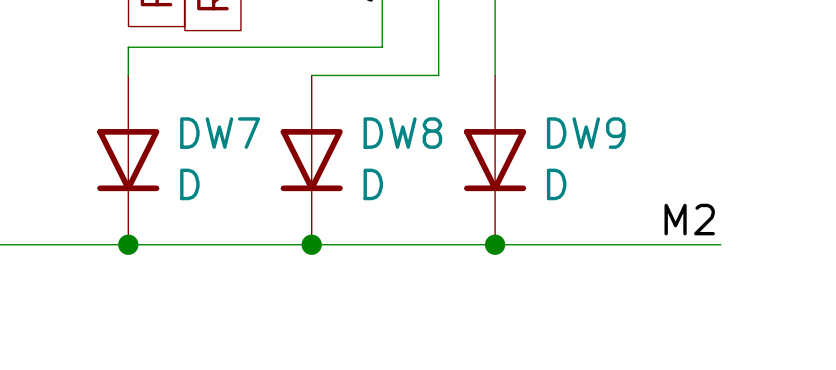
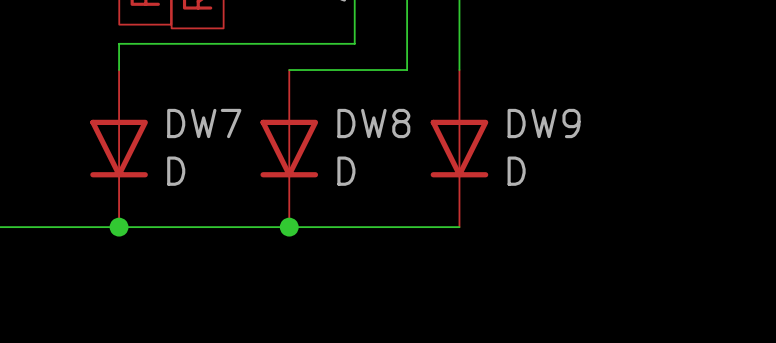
label: M2 (689, 219) -> none
wire: (495, 244) (720, 244) -> none
junction: (495, 244) -> none

